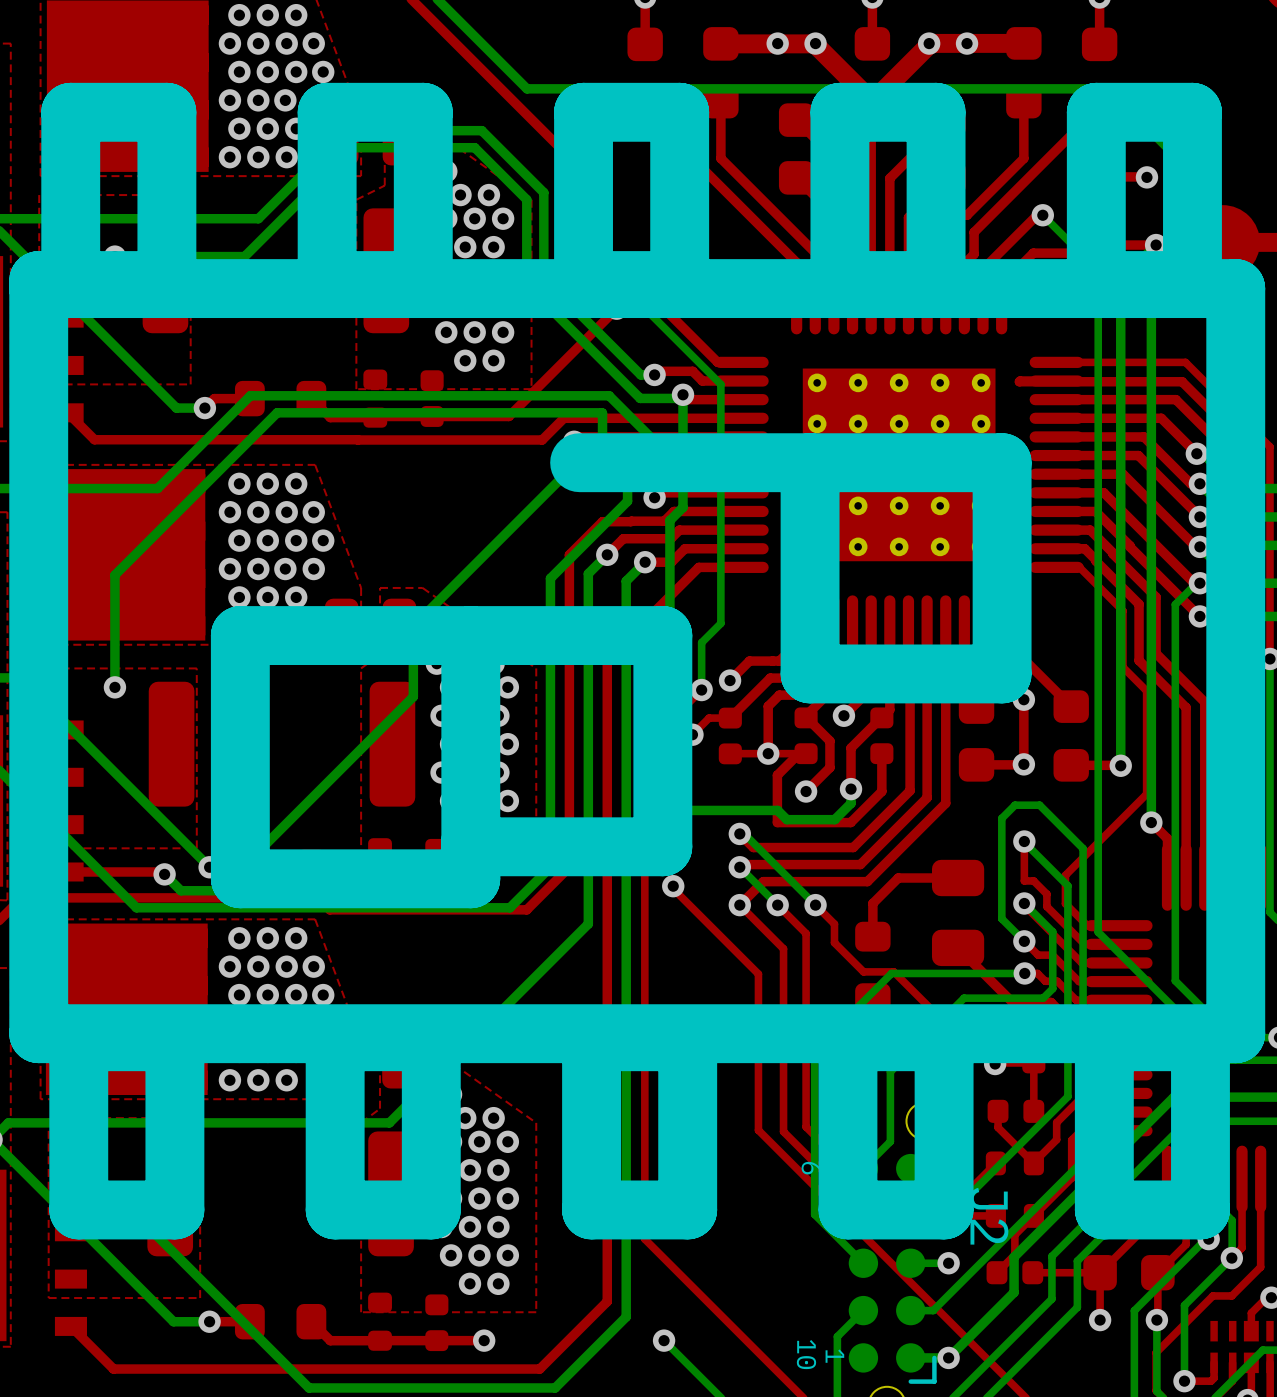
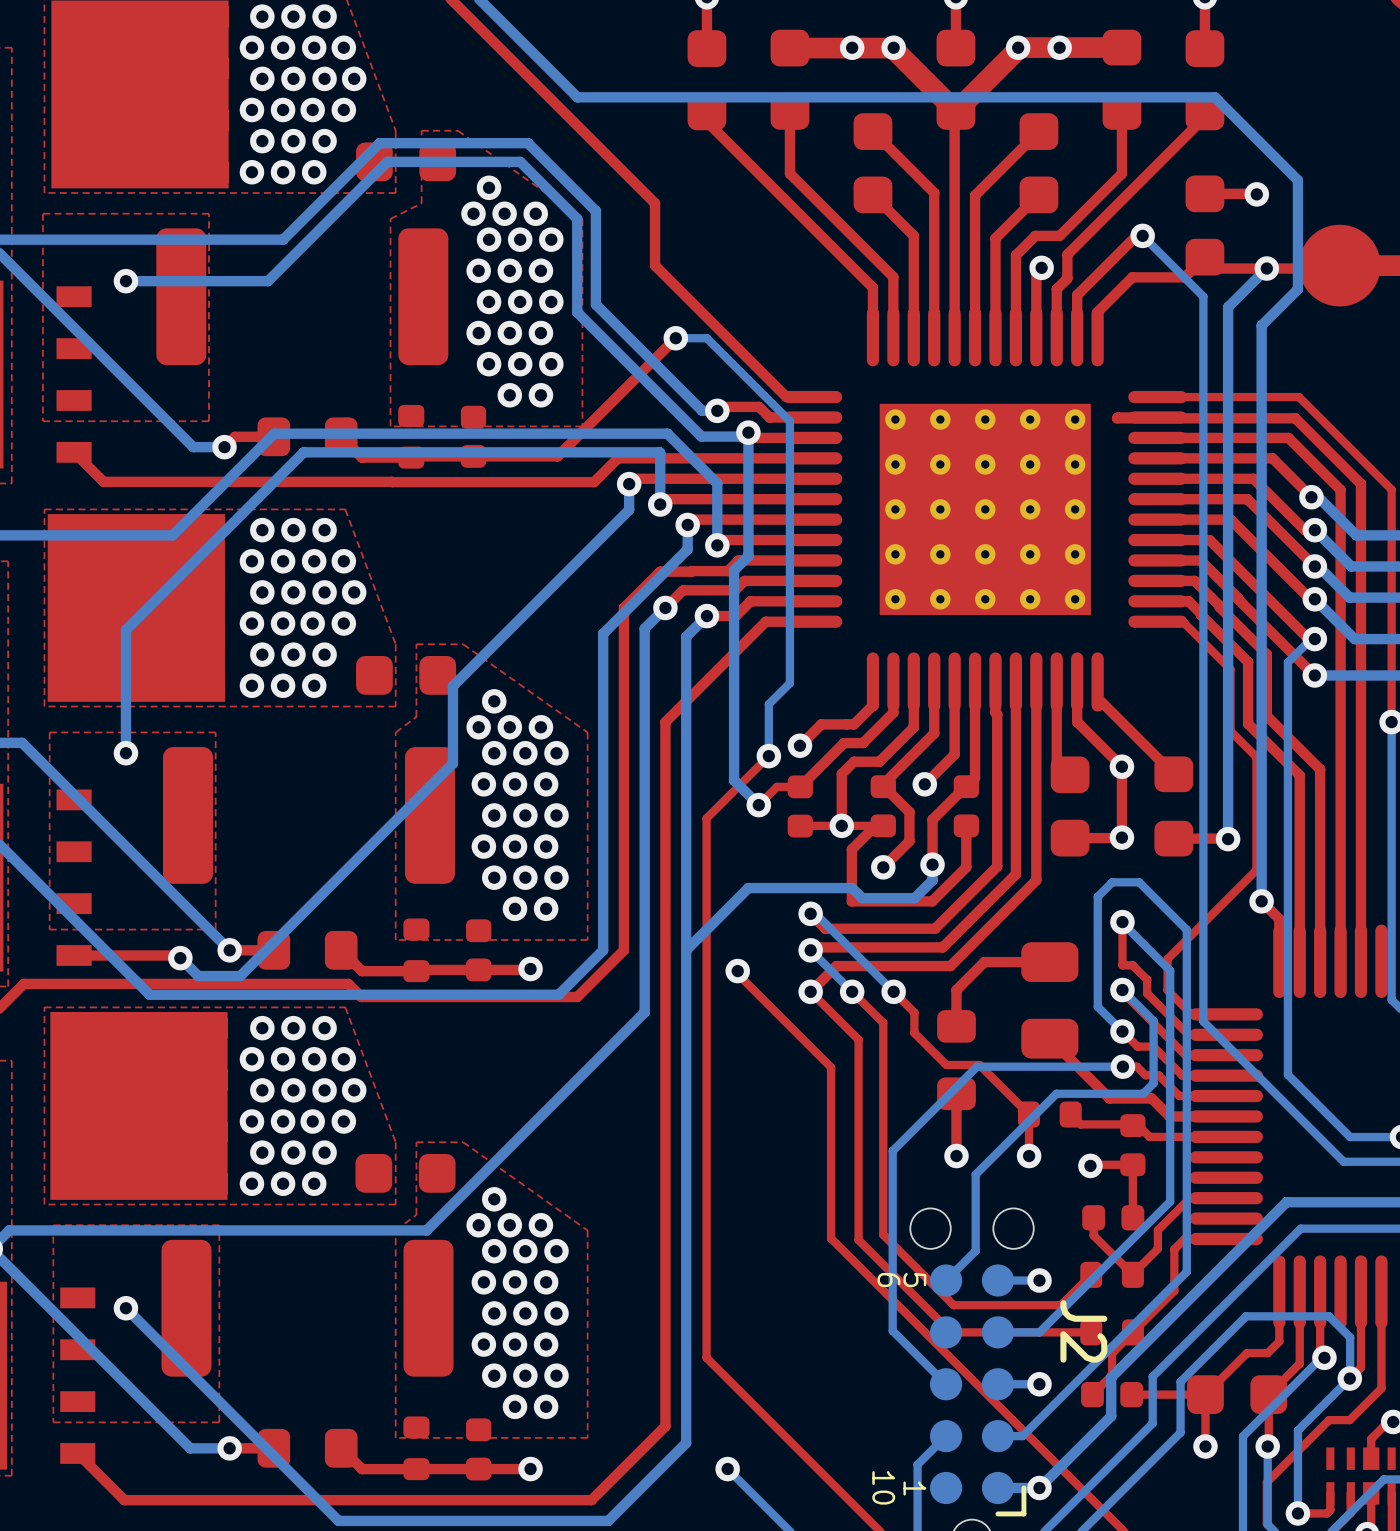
line: (423, 112) (327, 112) (327, 280) (423, 280) (423, 112) -> none
line: (679, 112) (583, 112) (583, 280) (679, 280) (679, 112) -> none
line: (936, 112) (936, 280) (839, 280) (839, 112) (936, 112) -> none
line: (1192, 112) (1096, 112) (1096, 280) (1192, 280) (1192, 112) -> none
line: (70, 280) (70, 112) (166, 112) (166, 280) (38, 280) (38, 1033) (1235, 1033) (1235, 288) (38, 288) -> none
line: (810, 462) (810, 673) (1002, 673) (1002, 462) (579, 462) -> none
line: (470, 635) (470, 878) (240, 878) (240, 635) (662, 635) (662, 846) (470, 846) -> none
line: (174, 1041) (174, 1209) (78, 1209) (78, 1041) (174, 1041) -> none
line: (431, 1041) (431, 1209) (335, 1209) (335, 1041) (431, 1041) -> none
line: (687, 1041) (591, 1041) (591, 1209) (687, 1209) (687, 1041) -> none
line: (944, 1041) (847, 1041) (847, 1209) (944, 1209) (944, 1041) -> none
line: (1200, 1041) (1200, 1209) (1104, 1209) (1104, 1041) (1200, 1041) -> none

